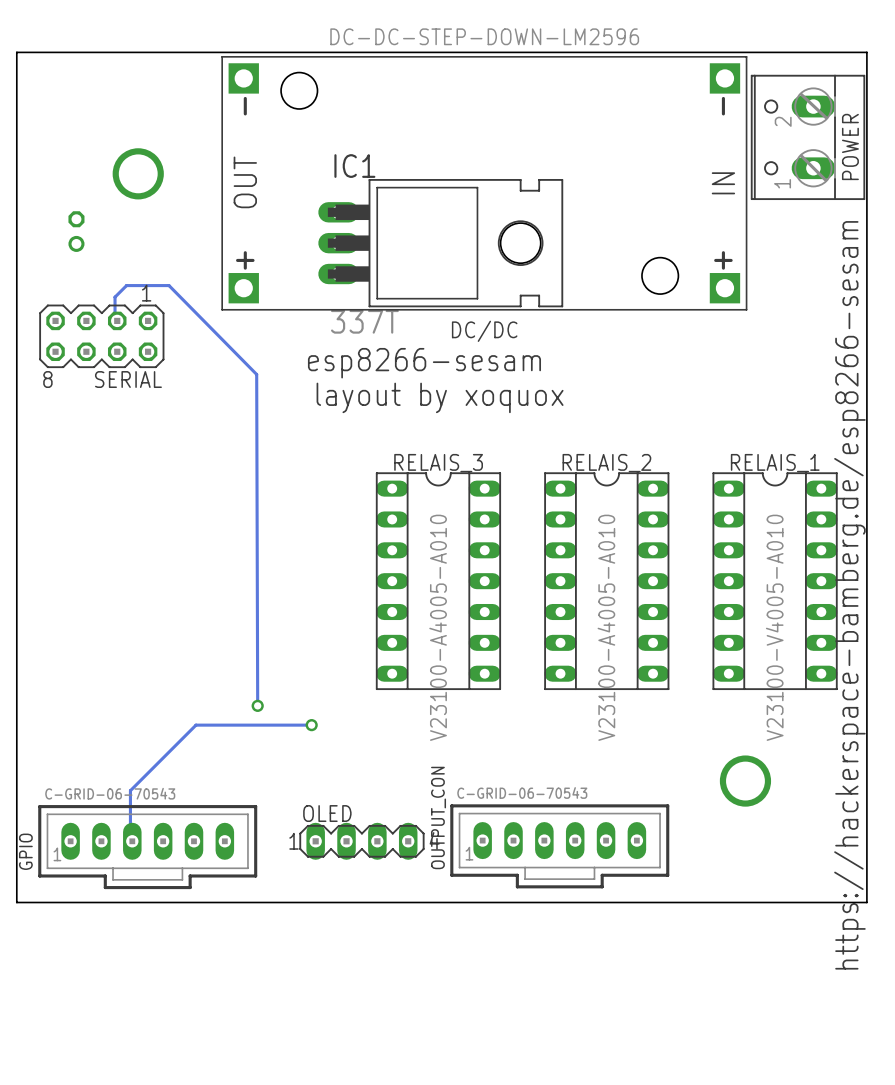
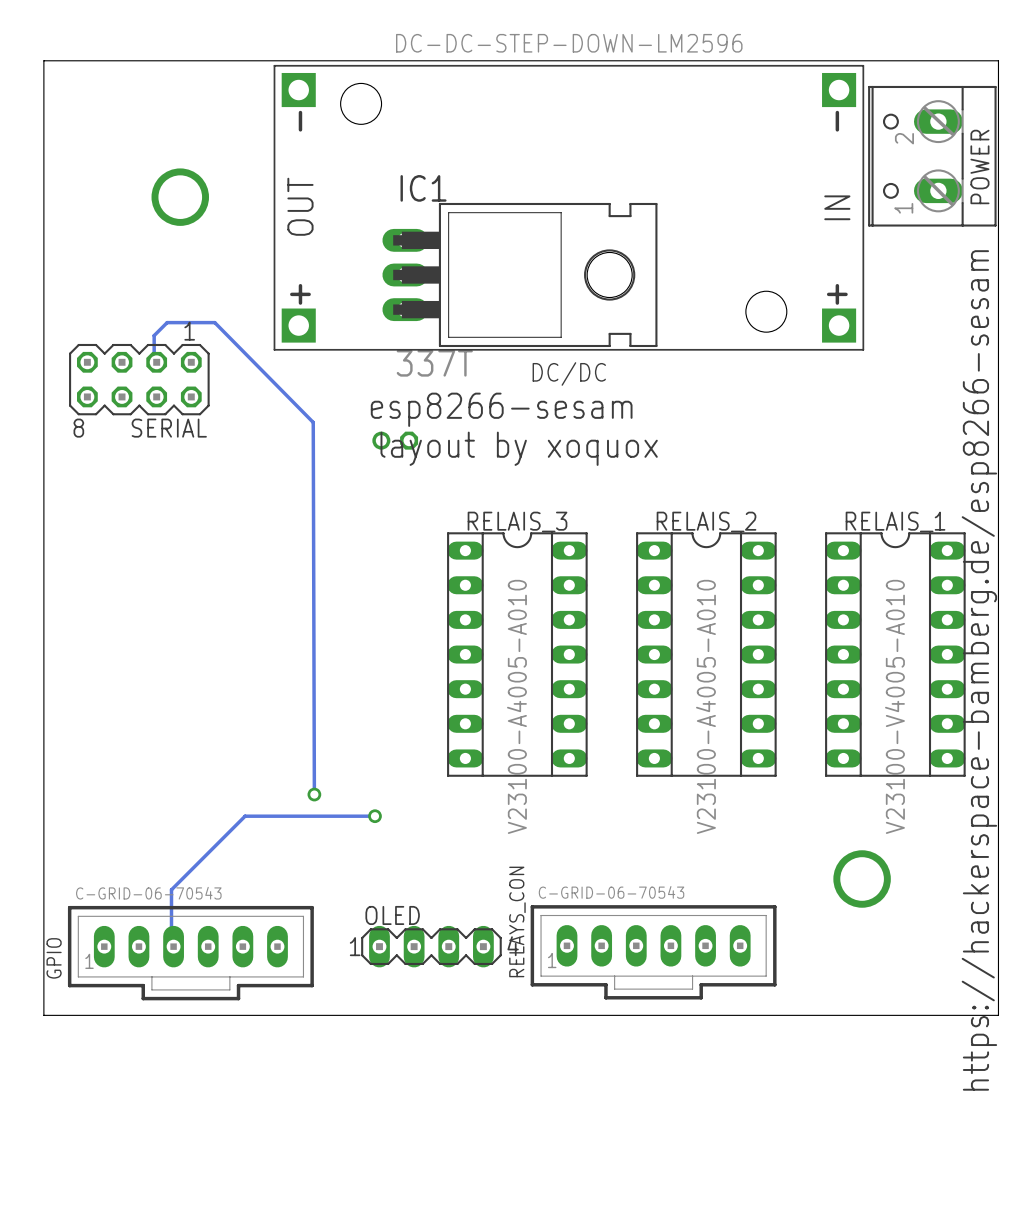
part rotation: 0° (76, 231) -> 90° clockwise (395, 440)
part position: (76, 231) -> (395, 440)
OUTPUT_CON name: OUTPUT_CON (438, 817) -> RELAYS_CON (517, 921)

